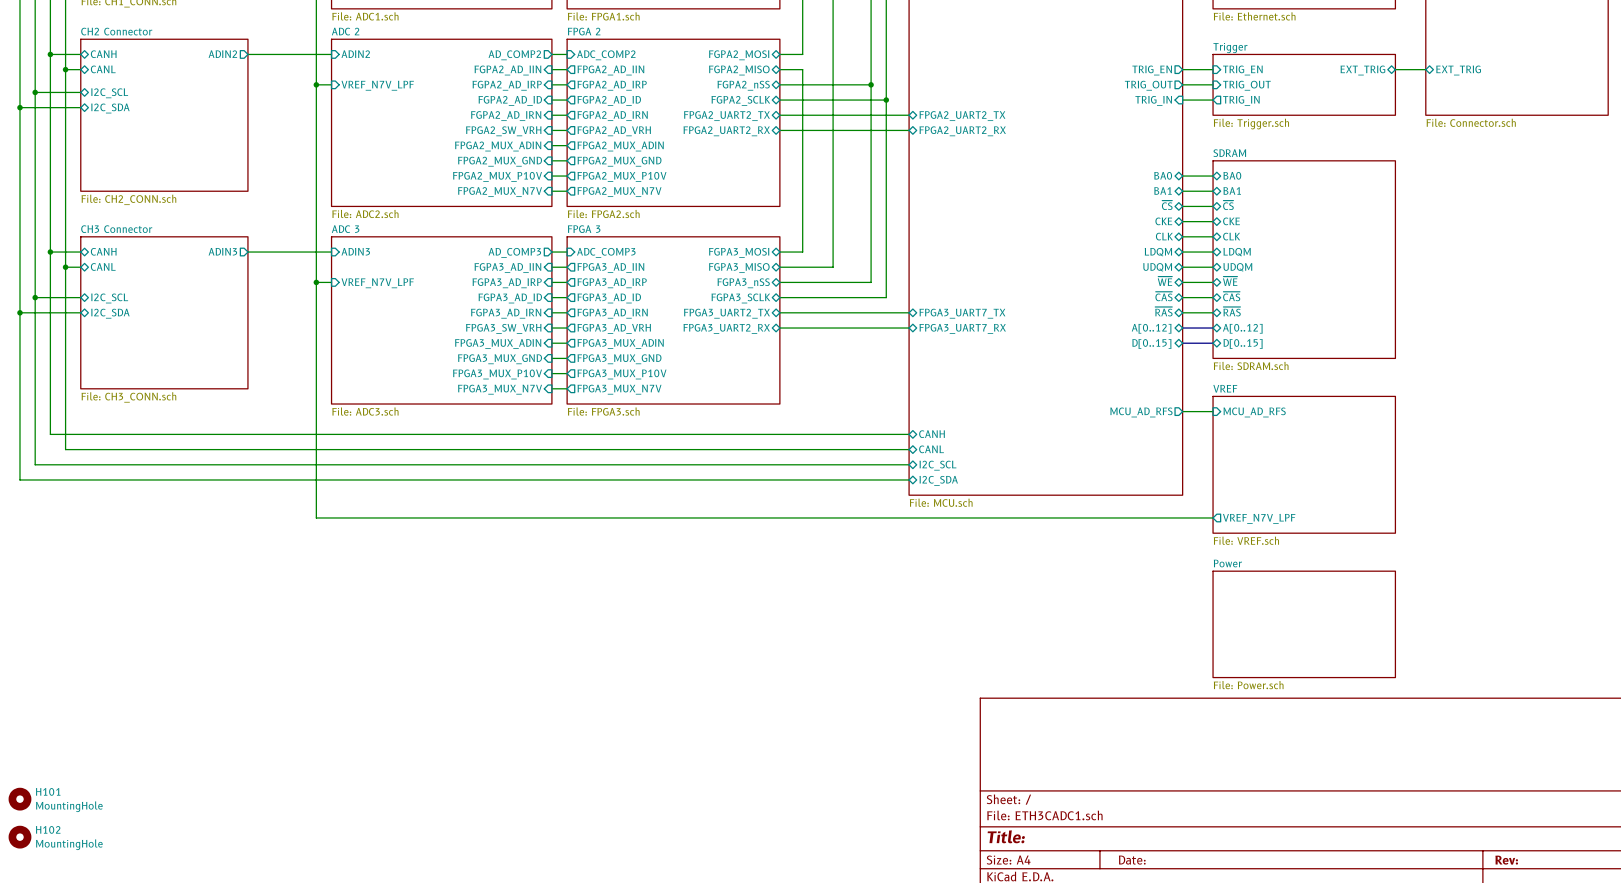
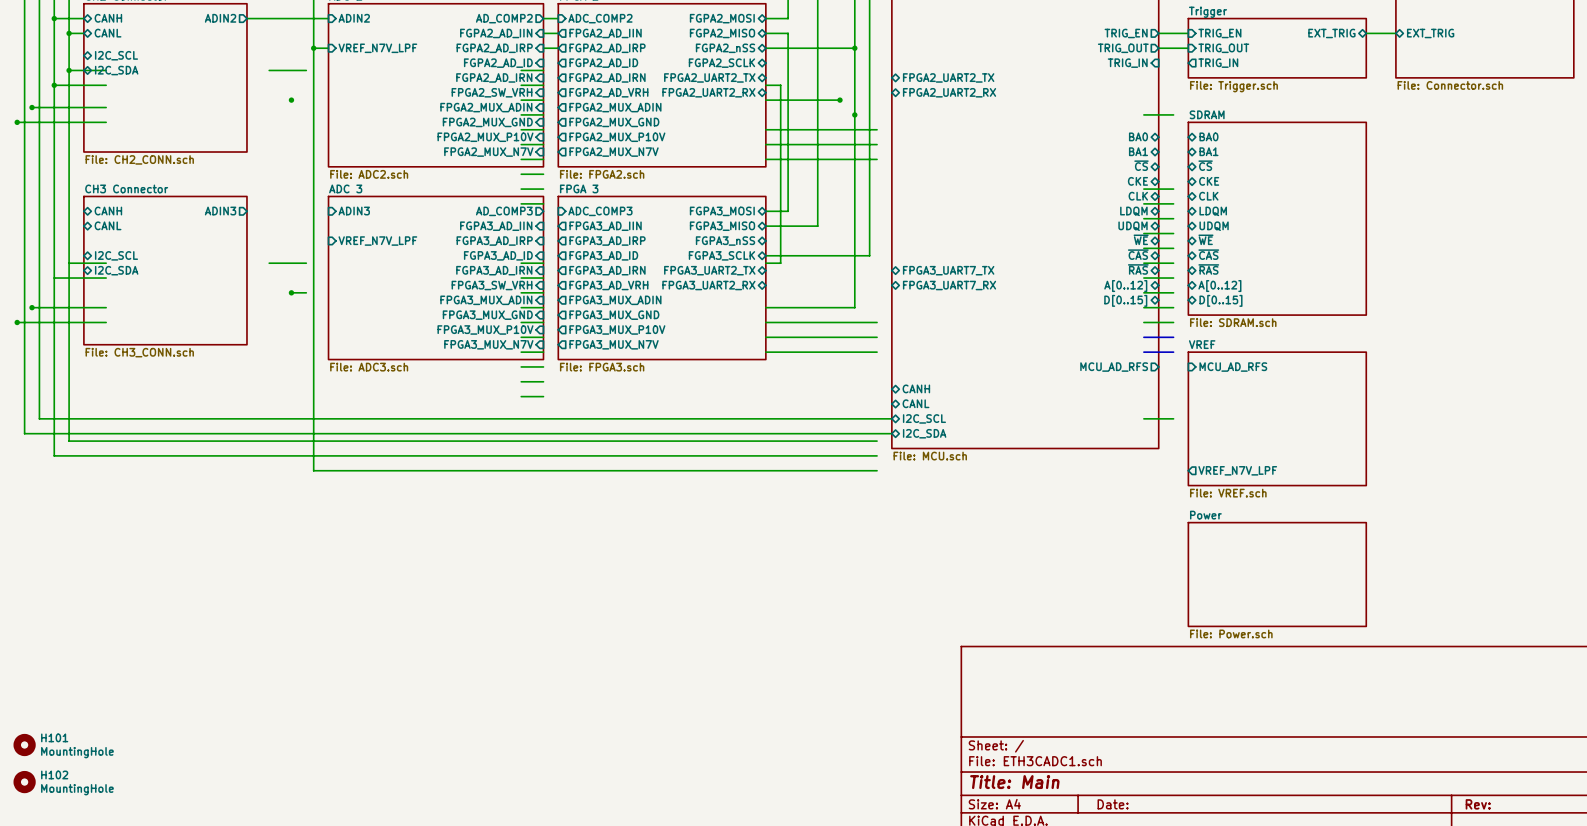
wire: (35, 92) (80, 92) -> none
junction: (35, 92) -> none
wire: (551, 100) (567, 100) -> none
wire: (779, 100) (886, 100) -> none
junction: (886, 100) -> none
wire: (1182, 100) (1213, 100) -> (1143, 114) (1173, 114)
wire: (19, 107) (65, 107) -> none
junction: (19, 107) -> none
junction: none -> (69, 70)
wire: none -> (83, 70) (106, 70)
wire: none -> (269, 70) (306, 70)
wire: none -> (521, 70) (543, 70)
wire: (551, 115) (567, 115) -> none
wire: (779, 115) (909, 115) -> none
wire: none -> (54, 85) (106, 85)
junction: none -> (54, 85)
wire: none -> (521, 85) (543, 85)
wire: none -> (765, 85) (780, 85) (780, 263) (765, 263)
wire: (551, 130) (567, 130) -> none
wire: (779, 130) (909, 130) -> none
junction: none -> (291, 100)
wire: none -> (521, 100) (543, 100)
wire: none -> (765, 100) (839, 100)
junction: none -> (839, 100)
wire: none -> (32, 107) (106, 107)
junction: none -> (32, 107)
wire: (551, 145) (567, 145) -> none
wire: none -> (521, 114) (543, 114)
junction: none -> (854, 114)
wire: none -> (17, 122) (106, 122)
junction: none -> (17, 122)
wire: (551, 160) (567, 160) -> none
wire: none -> (521, 129) (543, 129)
wire: none -> (765, 129) (877, 129)
wire: (551, 176) (567, 176) -> none
wire: (1182, 176) (1213, 176) -> (1143, 189) (1173, 189)
wire: none -> (521, 144) (543, 144)
wire: none -> (765, 144) (877, 144)
wire: (551, 191) (567, 191) -> none
wire: (1182, 191) (1213, 191) -> (1143, 203) (1173, 203)
wire: none -> (521, 159) (543, 159)
wire: none -> (765, 159) (877, 159)
wire: (1182, 206) (1213, 206) -> (1143, 218) (1173, 218)
wire: none -> (521, 174) (543, 174)
wire: (1182, 221) (1213, 221) -> (1143, 233) (1173, 233)
wire: none -> (521, 189) (543, 189)
wire: (1182, 236) (1213, 236) -> (1143, 248) (1173, 248)
wire: none -> (521, 203) (543, 203)
wire: (50, 252) (80, 252) -> none
junction: (50, 252) -> none
wire: (247, 252) (331, 252) -> none
wire: (551, 252) (567, 252) -> none
wire: (1182, 252) (1213, 252) -> (1143, 263) (1173, 263)
wire: (65, 267) (80, 267) -> none
junction: (65, 267) -> none
wire: (551, 267) (567, 267) -> none
wire: (1182, 267) (1213, 267) -> (1143, 278) (1173, 278)
wire: (316, 282) (331, 282) -> (291, 292) (306, 292)
junction: (316, 282) -> none
wire: (551, 282) (567, 282) -> none
wire: (779, 282) (871, 282) -> (765, 307) (854, 307) (854, 240)
wire: (1182, 282) (1213, 282) -> (1143, 292) (1173, 292)
wire: (35, 297) (80, 297) -> none
junction: (35, 297) -> none
wire: (551, 297) (567, 297) -> none
wire: (1182, 297) (1213, 297) -> (1143, 307) (1173, 307)
wire: none -> (69, 263) (106, 263)
wire: none -> (269, 263) (306, 263)
wire: none -> (521, 263) (543, 263)
wire: (19, 312) (80, 312) -> none
junction: (19, 312) -> none
wire: (551, 312) (567, 312) -> none
wire: (779, 312) (909, 312) -> none
wire: (1182, 312) (1213, 312) -> (1143, 322) (1173, 322)
wire: none -> (54, 278) (106, 278)
wire: none -> (521, 278) (543, 278)
wire: (551, 328) (567, 328) -> none
wire: (779, 328) (909, 328) -> none
bus: (1182, 328) (1213, 328) -> (1143, 337) (1173, 337)
junction: none -> (291, 292)
wire: none -> (521, 292) (543, 292)
wire: (551, 343) (567, 343) -> none
bus: (1182, 343) (1213, 343) -> (1143, 352) (1173, 352)
wire: none -> (32, 307) (106, 307)
junction: none -> (32, 307)
wire: none -> (521, 307) (543, 307)
wire: (551, 358) (567, 358) -> none
wire: none -> (17, 322) (106, 322)
junction: none -> (17, 322)
wire: none -> (521, 322) (543, 322)
wire: none -> (765, 322) (877, 322)
wire: (551, 373) (567, 373) -> none
wire: none -> (521, 337) (543, 337)
wire: none -> (765, 337) (877, 337)
wire: (551, 388) (567, 388) -> none
wire: none -> (521, 352) (543, 352)
wire: none -> (765, 352) (877, 352)
wire: none -> (521, 366) (543, 366)
wire: (1182, 411) (1213, 411) -> (1143, 418) (1173, 418)
wire: none -> (521, 381) (543, 381)
wire: (50, 434) (909, 434) -> (54, 389) (54, 455) (877, 455)
wire: none -> (521, 396) (543, 396)
wire: (65, 449) (909, 449) -> (69, 404) (69, 441) (877, 441)
wire: (893, 517) (1213, 517) -> none
title block: Title: (1006, 836) -> Title: Main (1014, 782)

